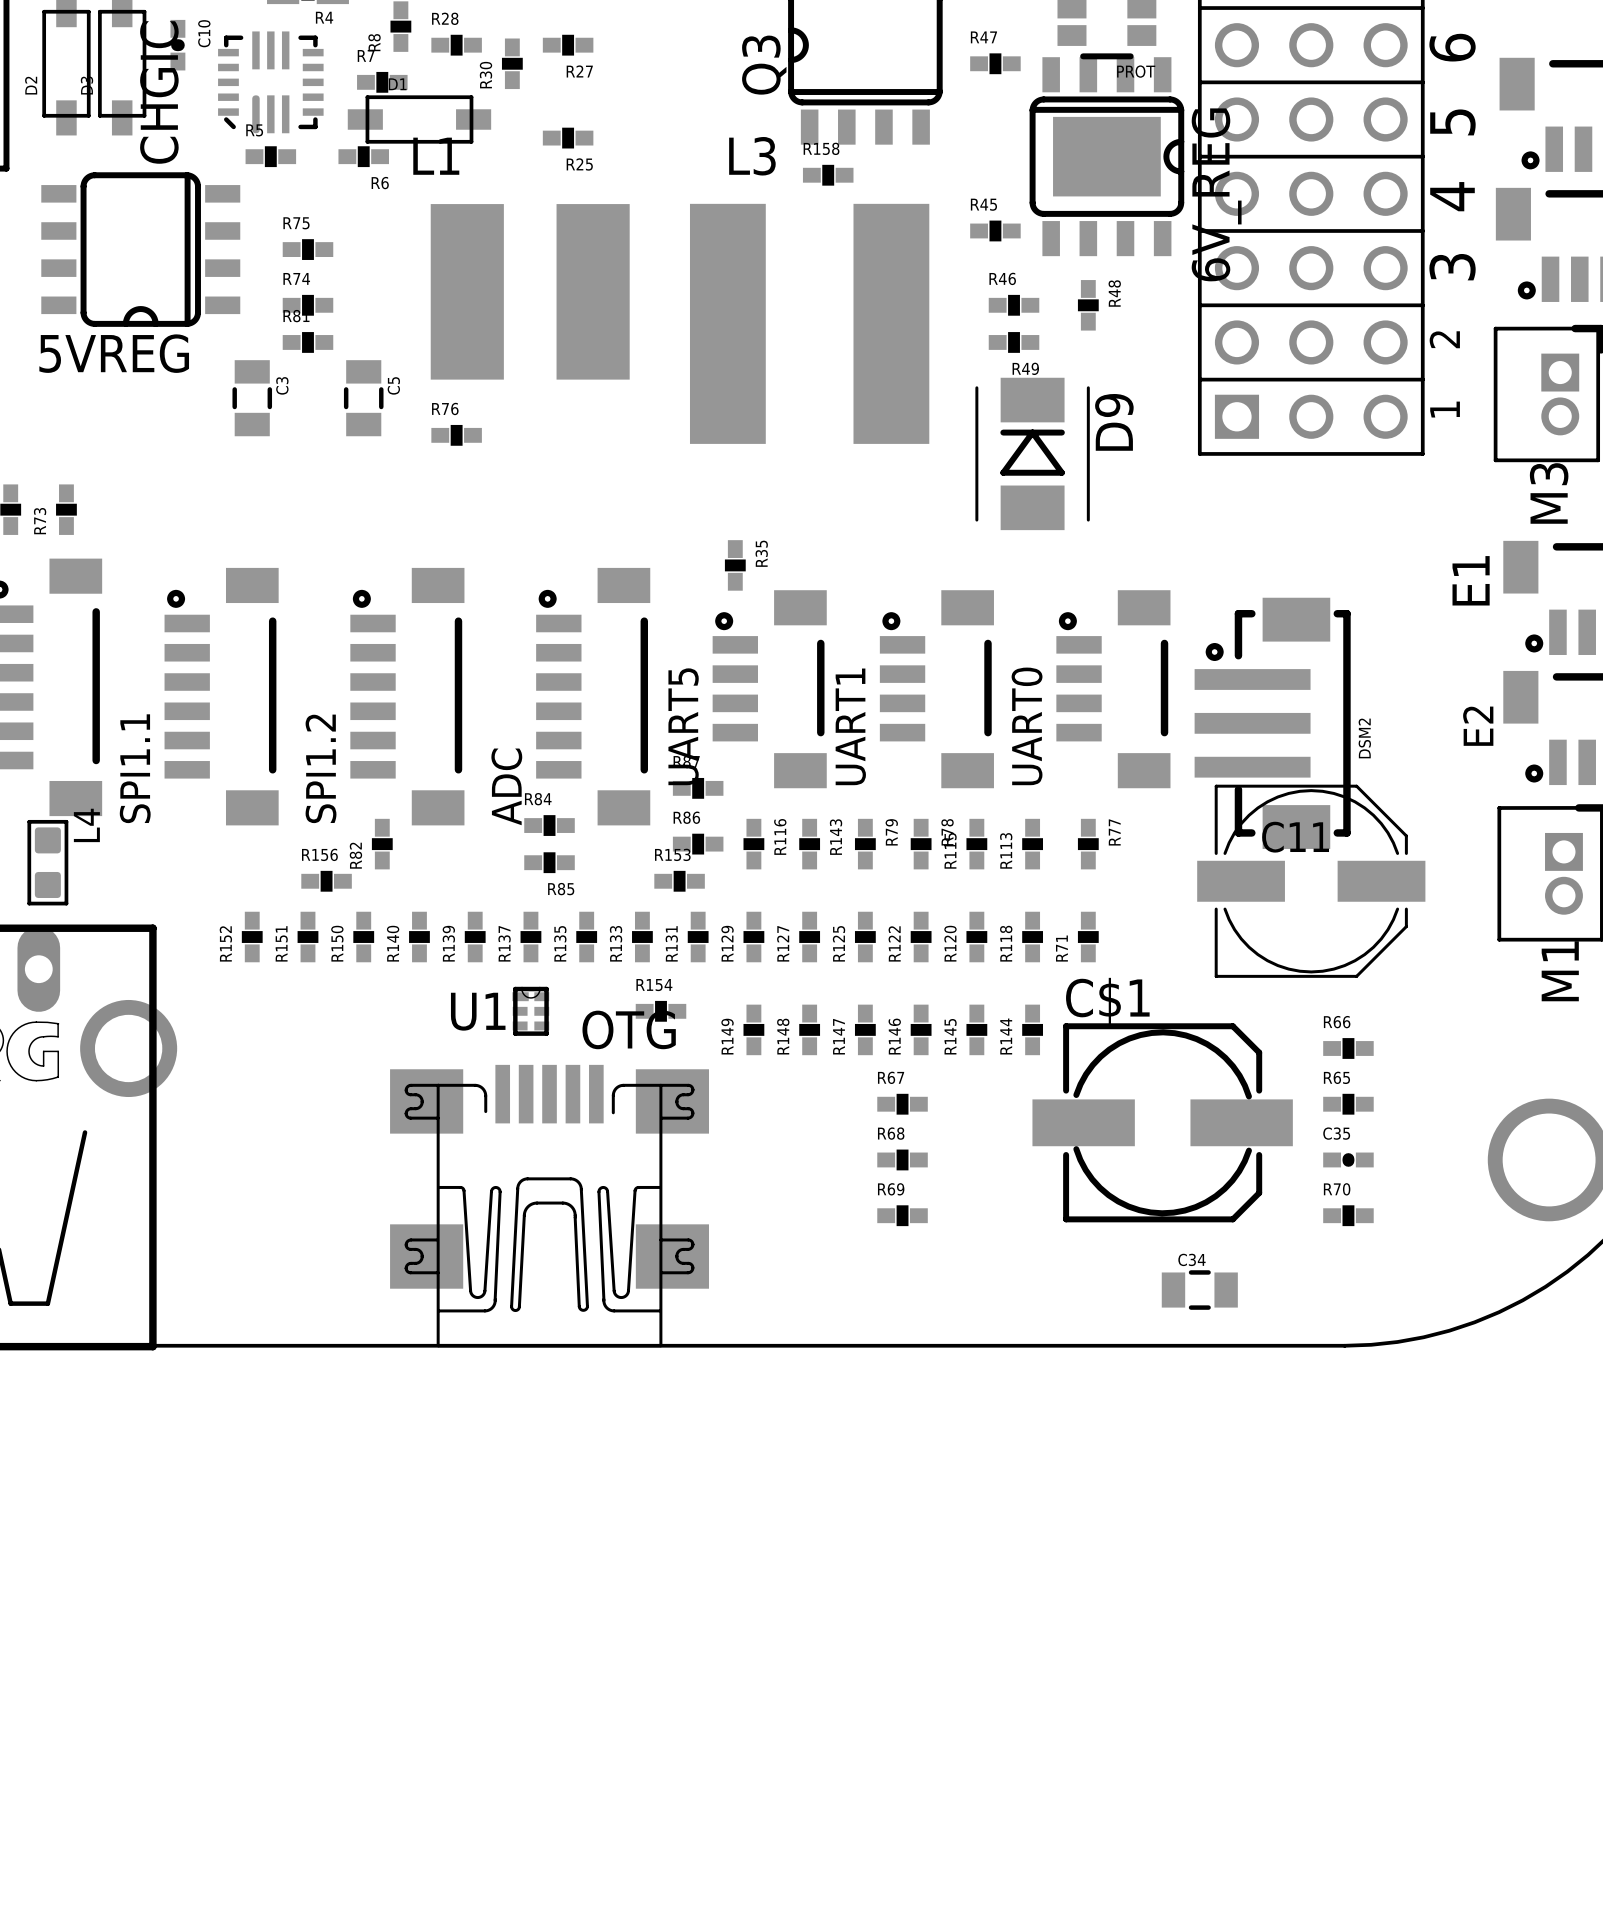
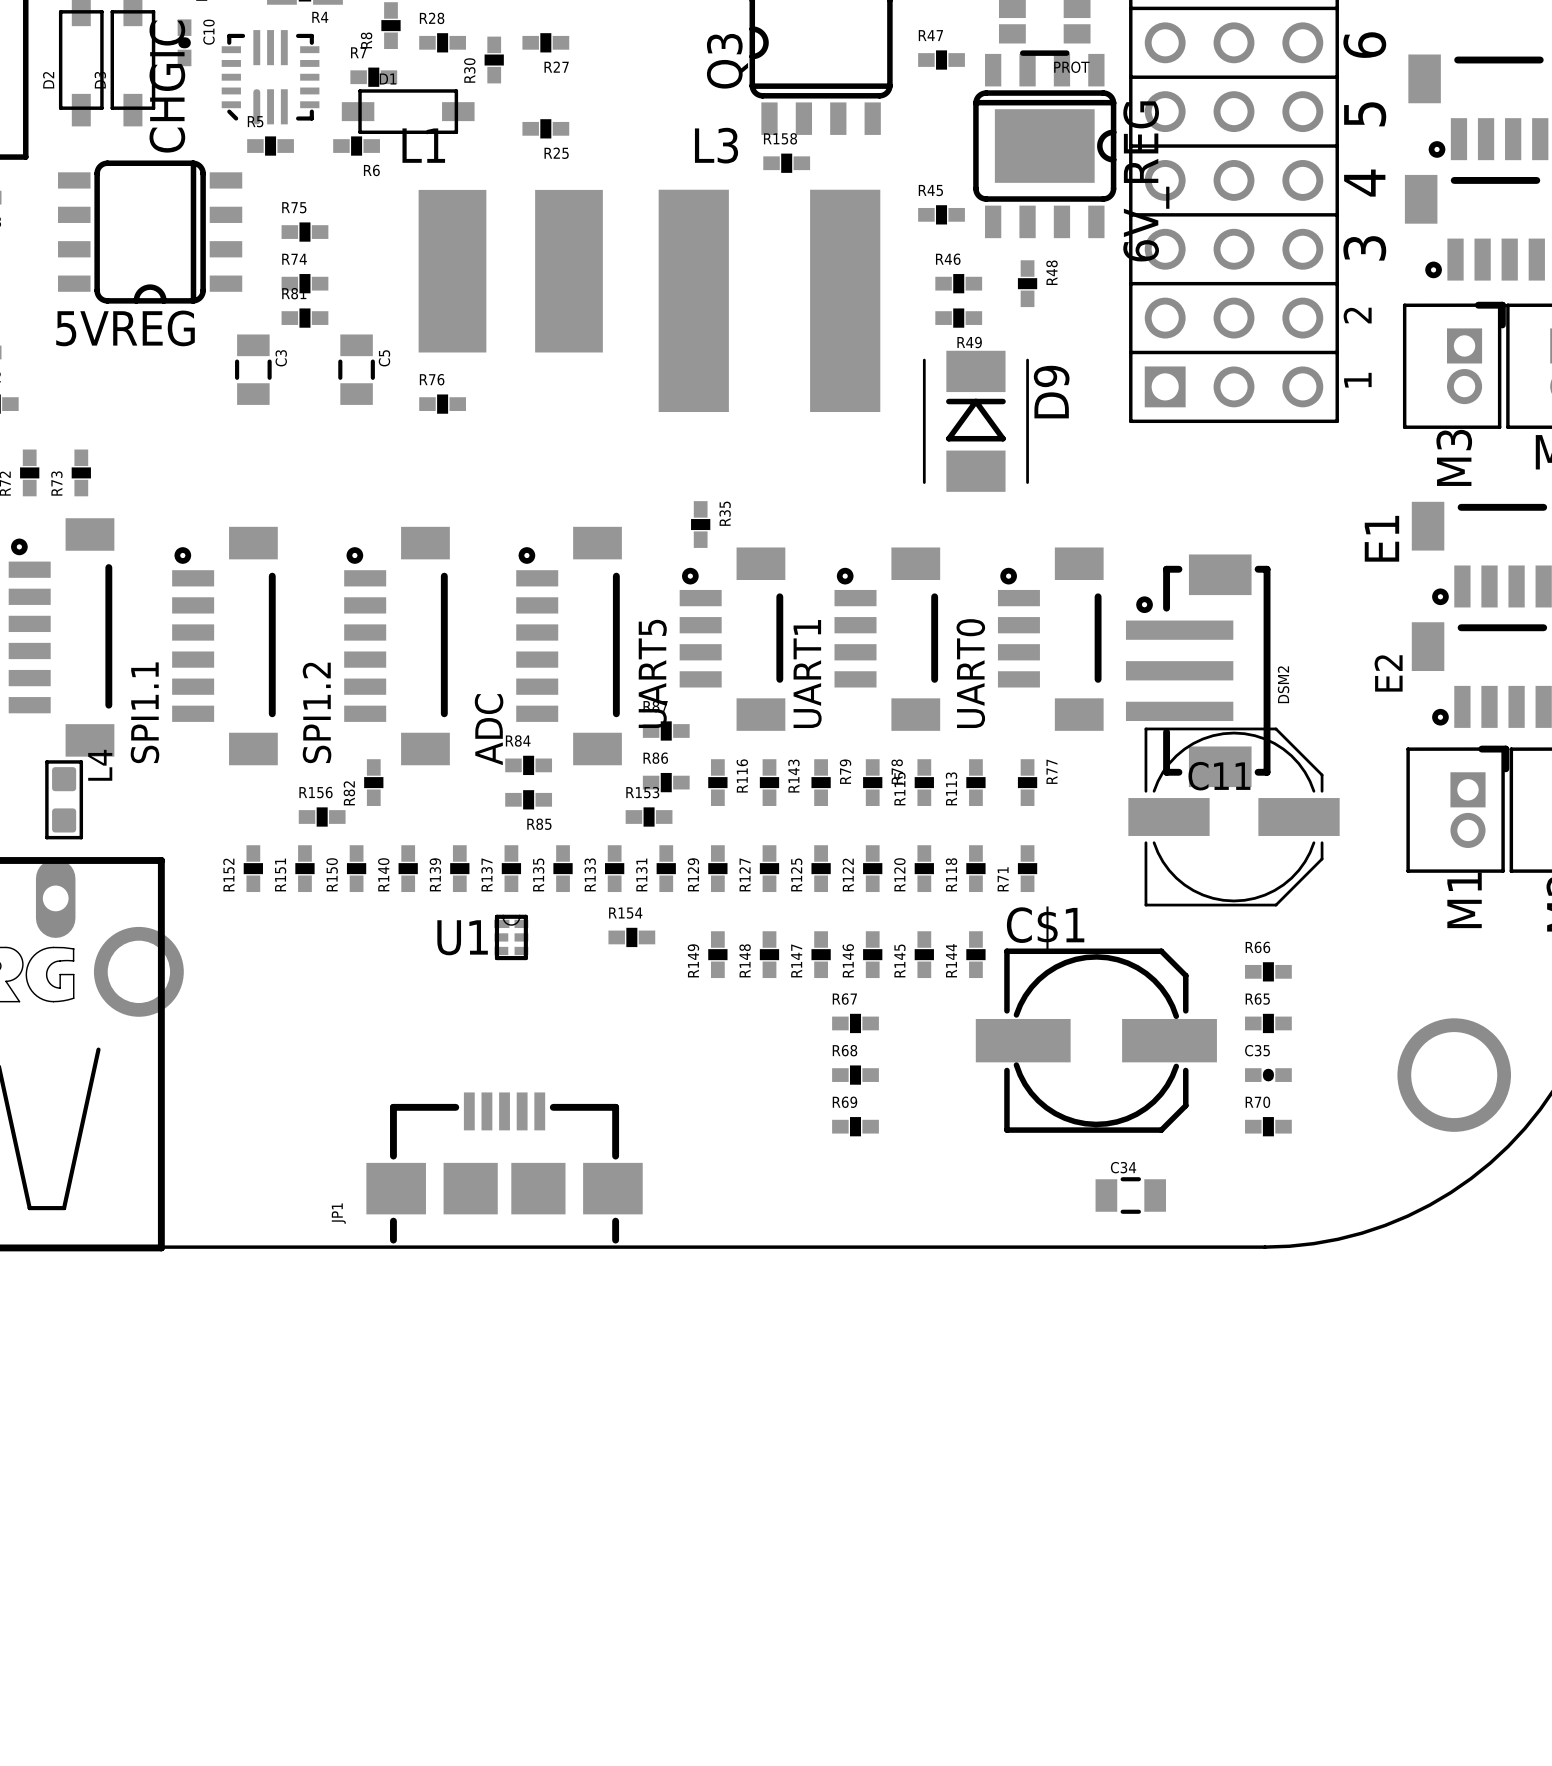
OTG: (549, 1206) -> none
JP1: none -> (504, 1167)

